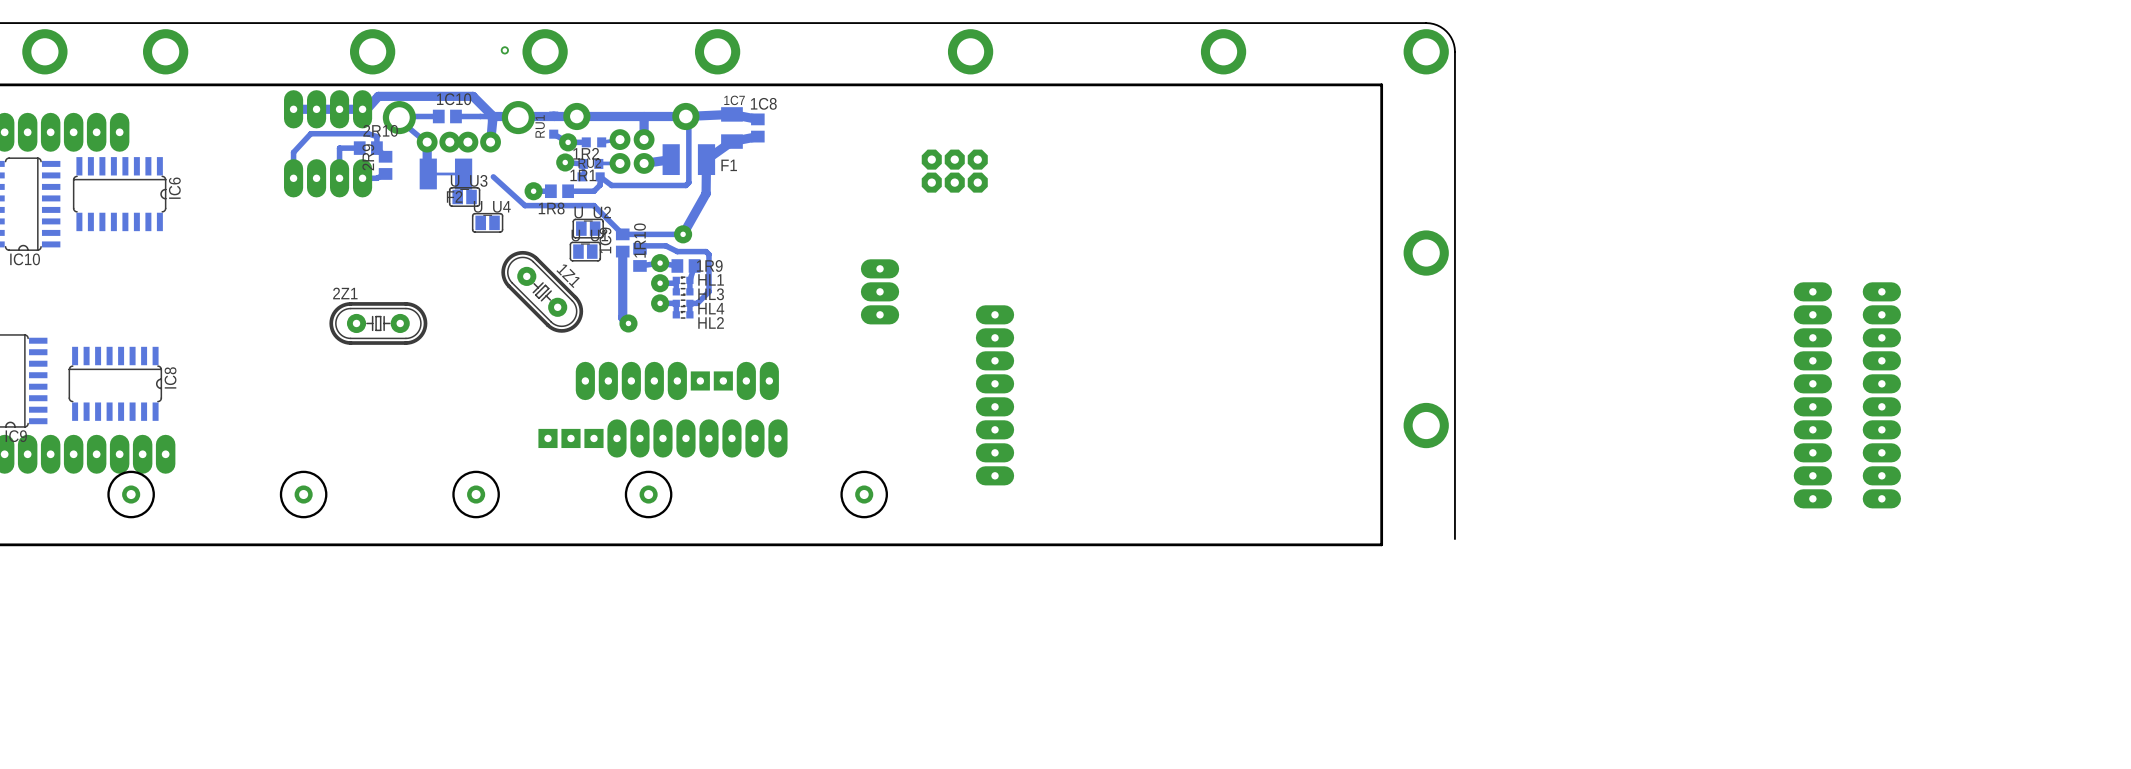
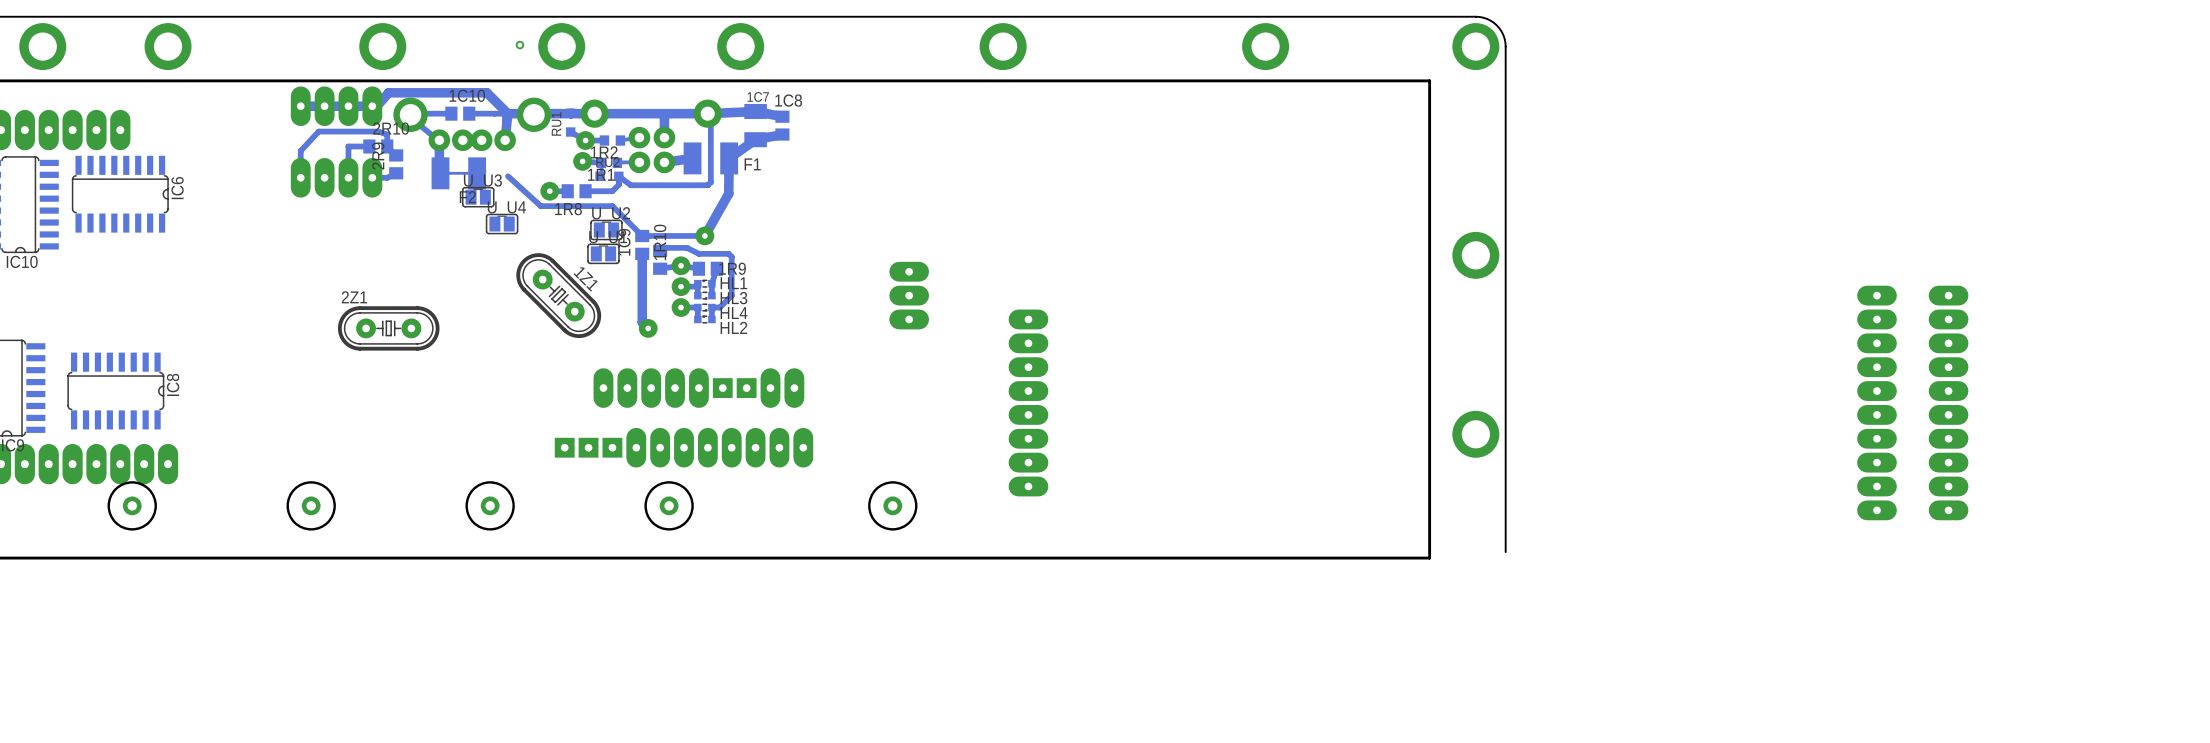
part: (954, 171) -> none

